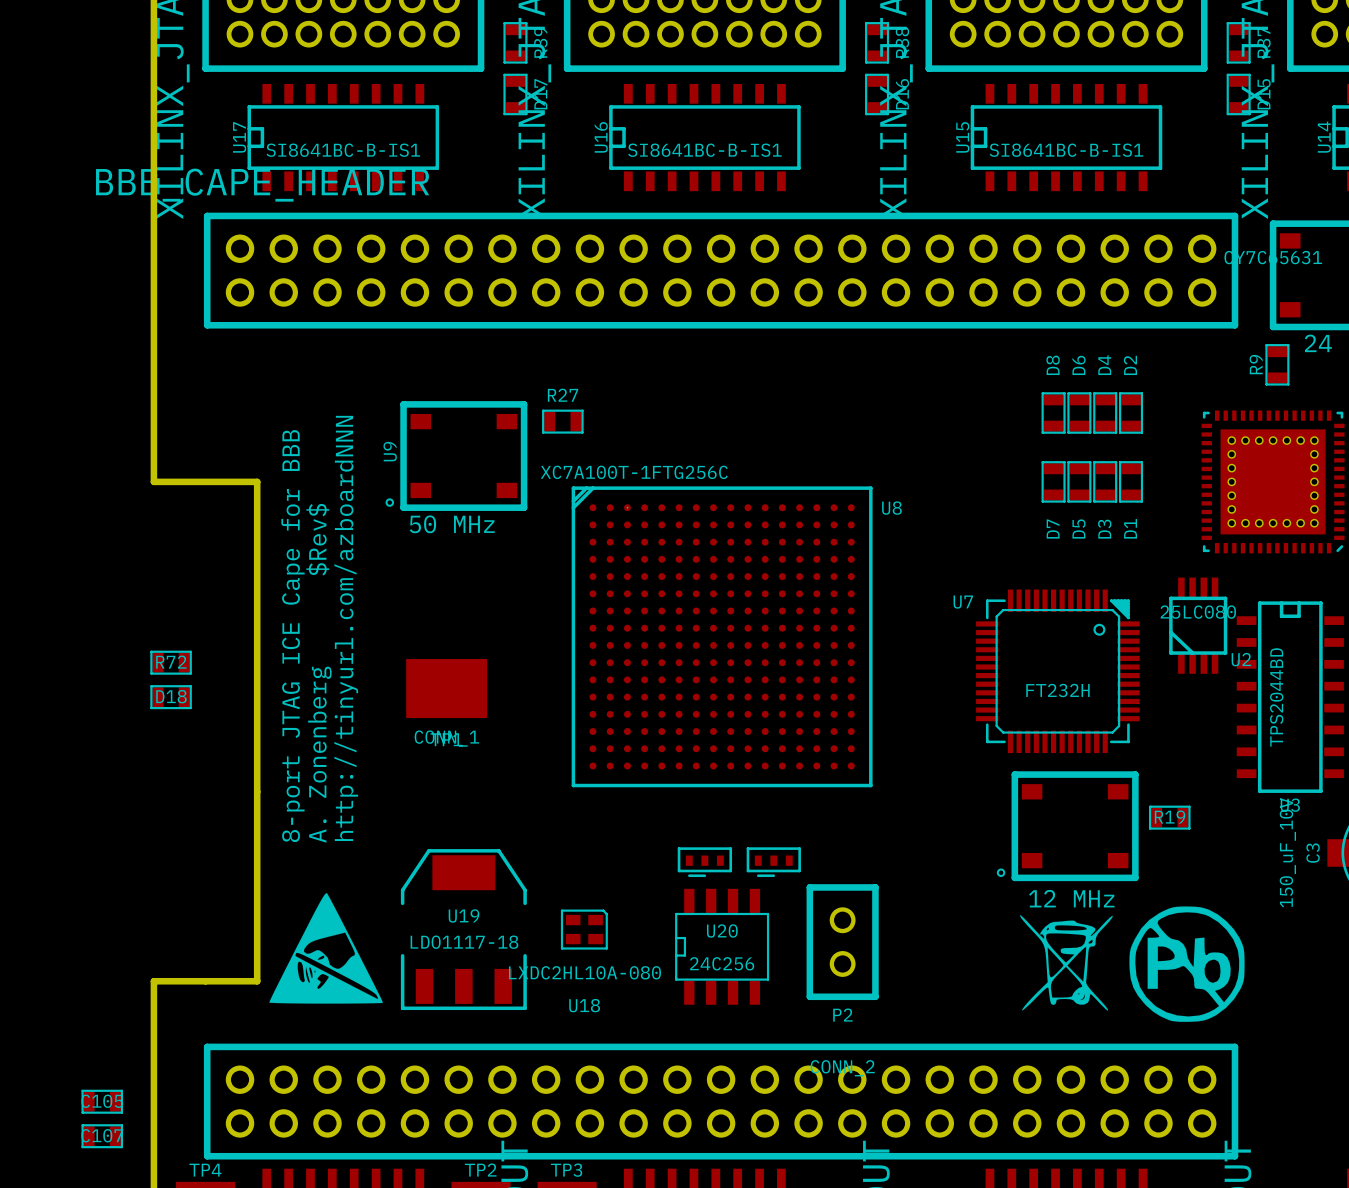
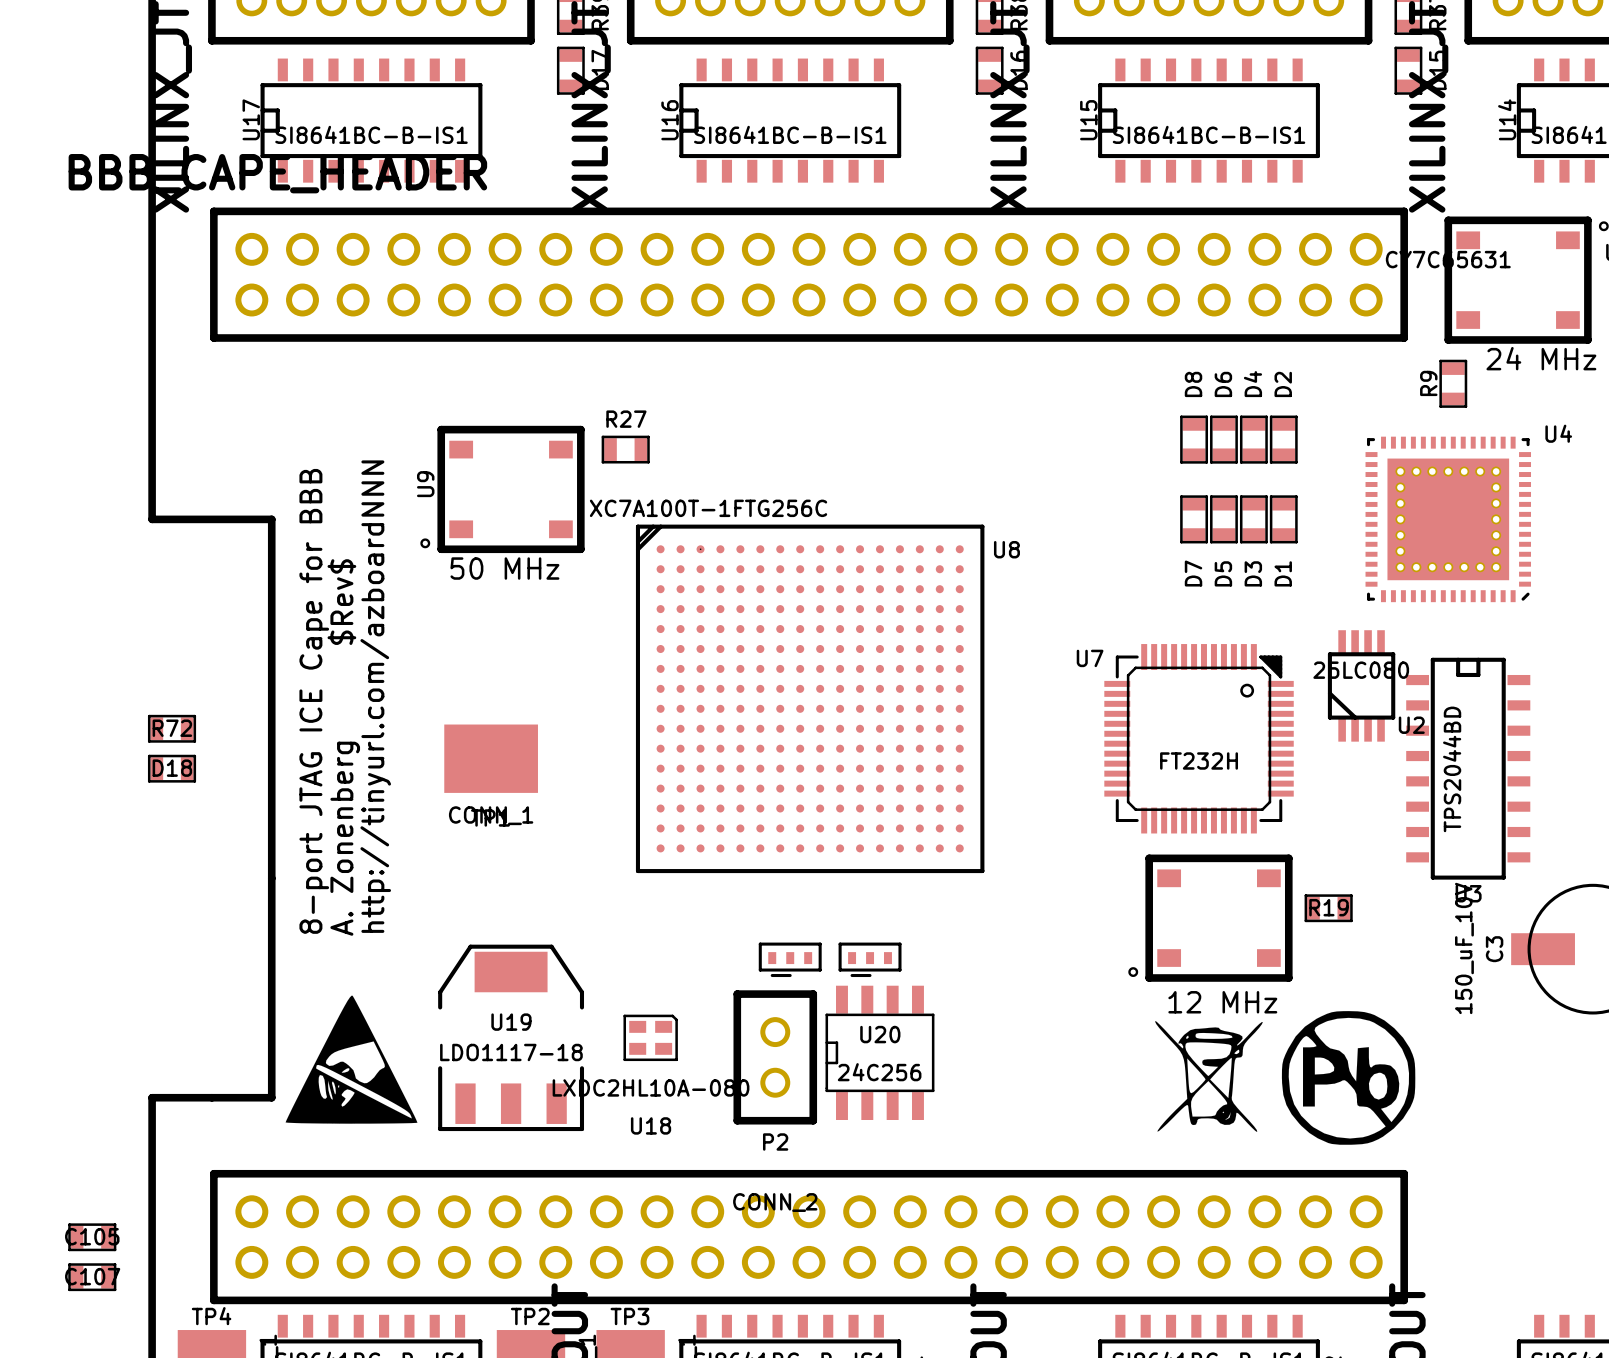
P2 position: (842, 942) -> (775, 1057)
U20 position: (722, 946) -> (879, 1052)

